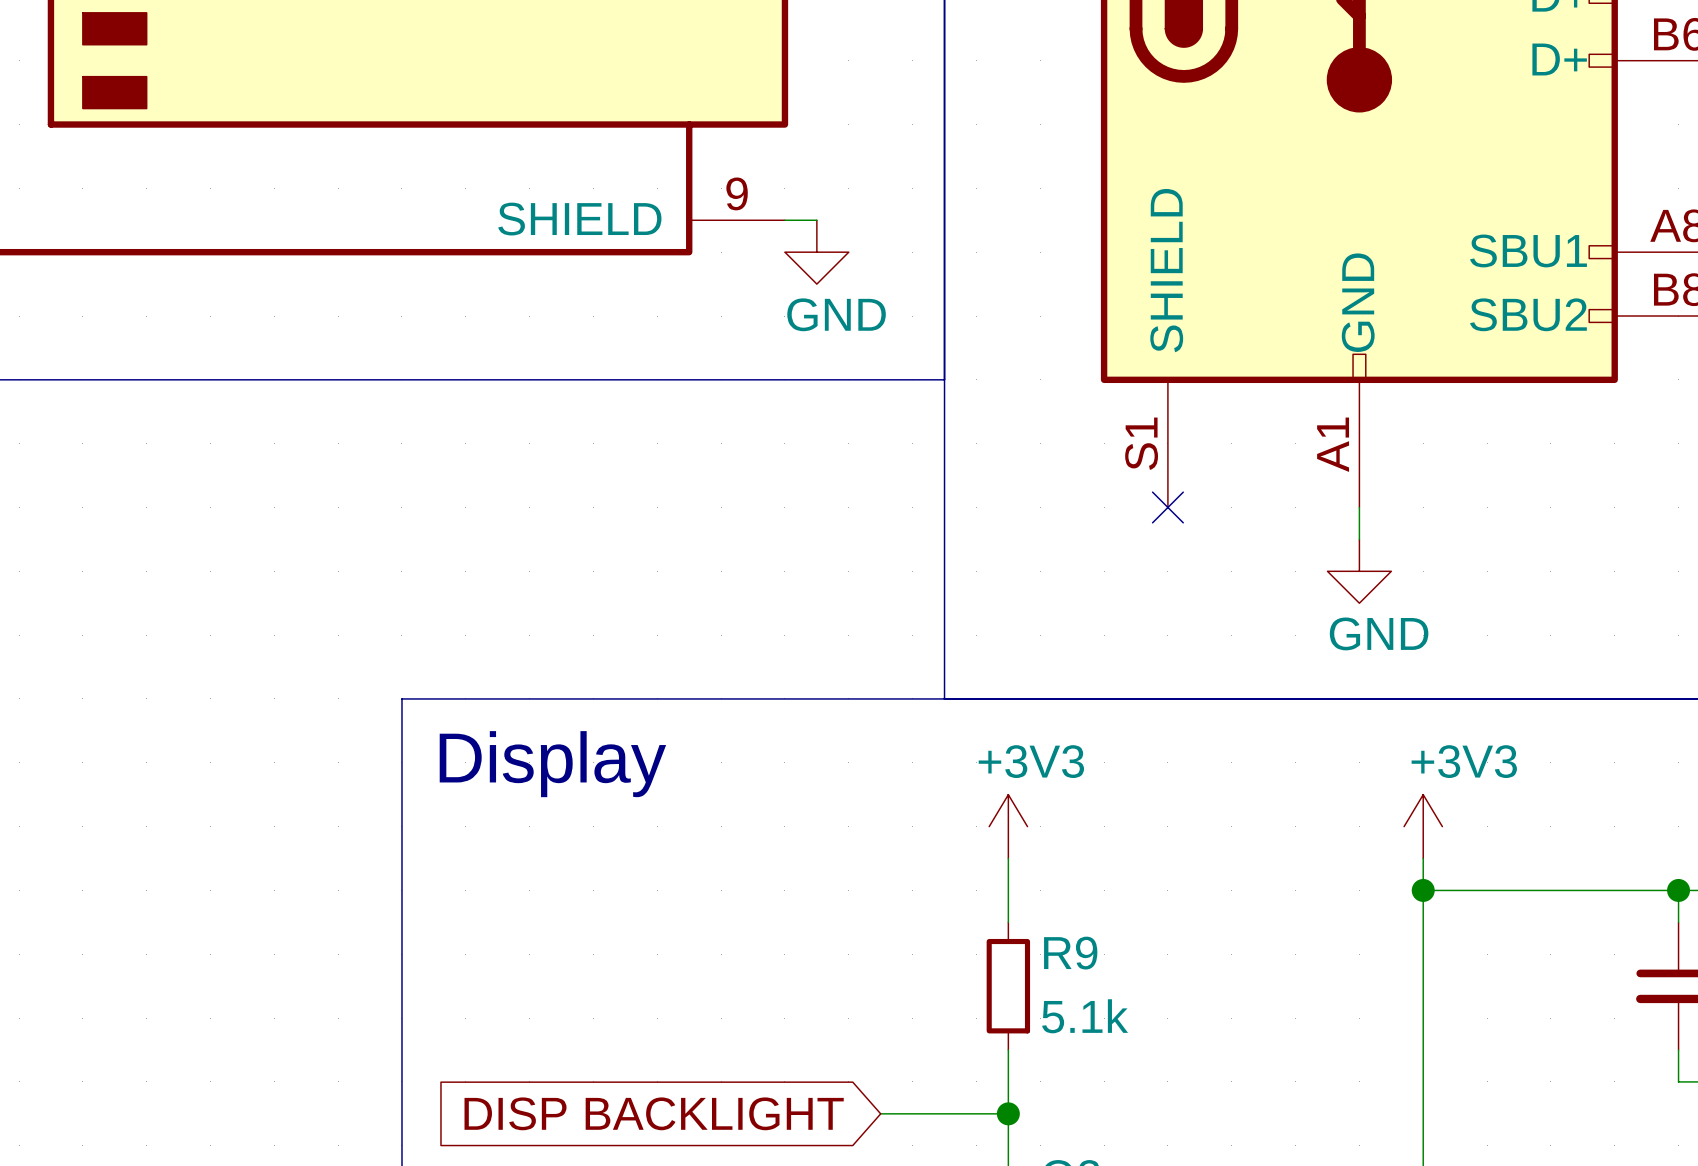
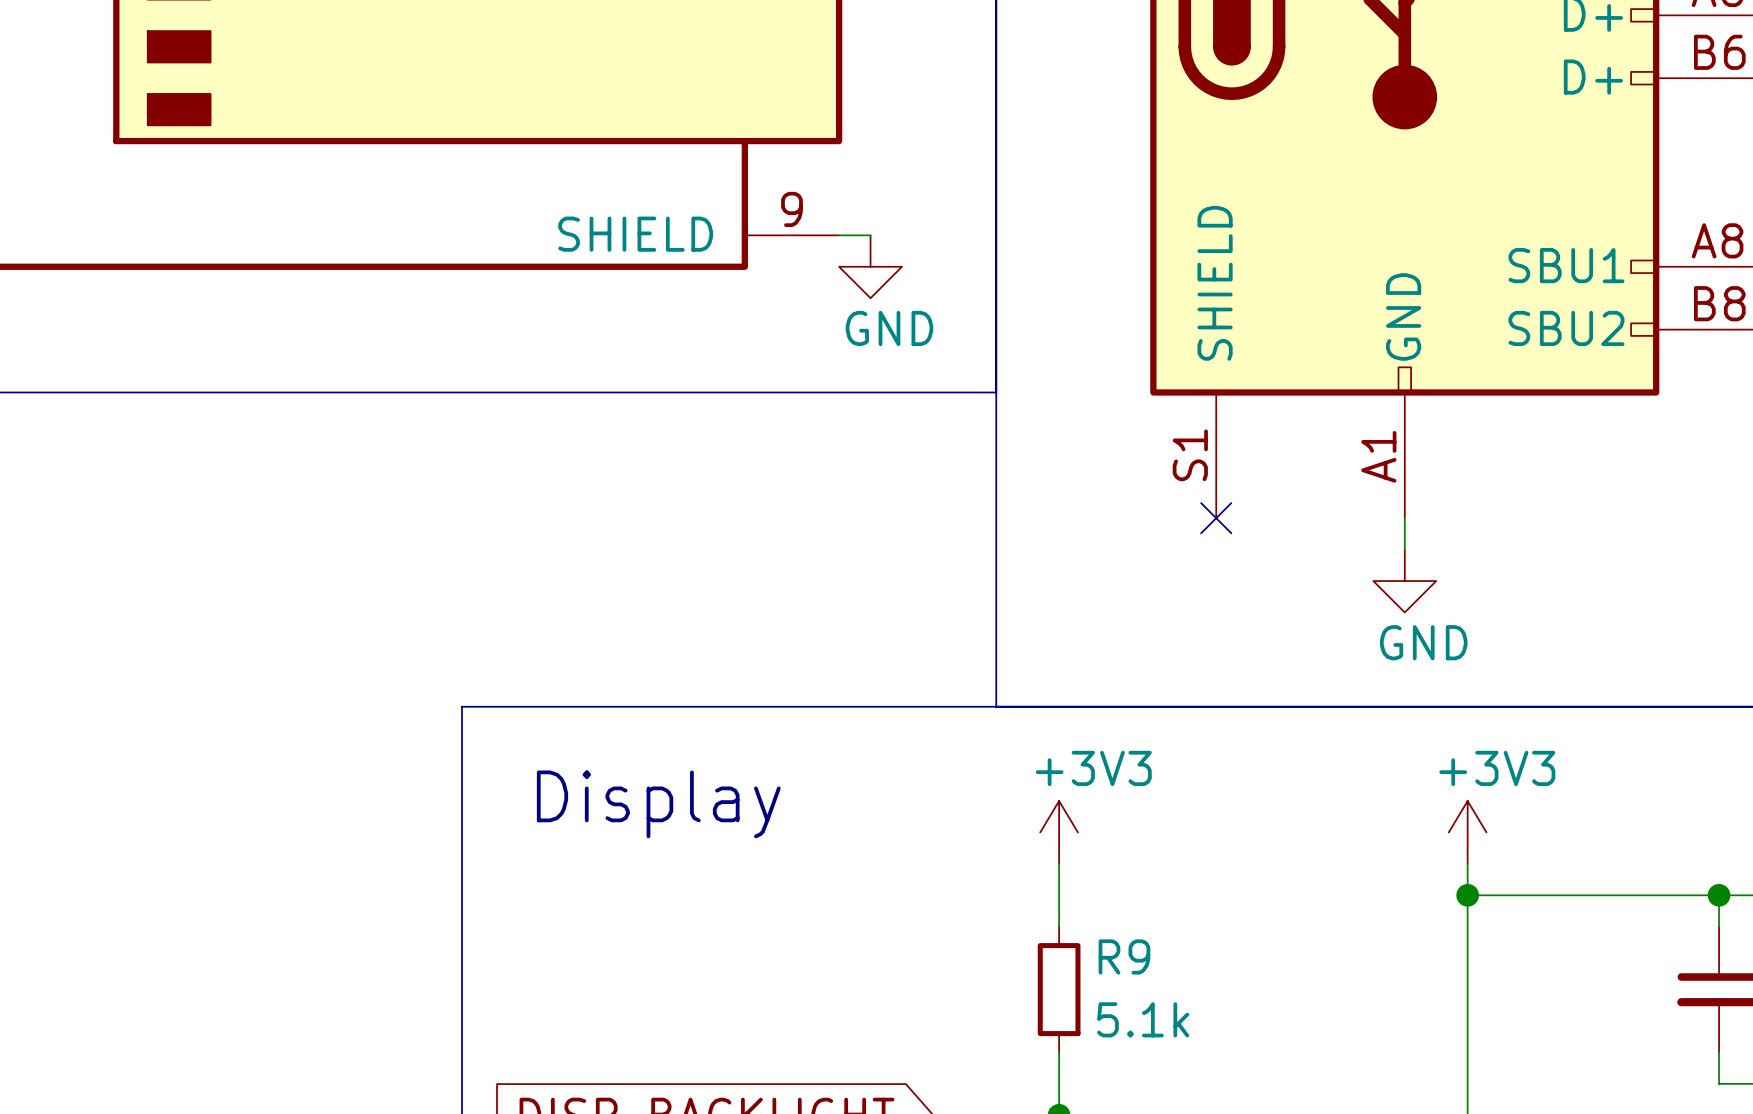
text position: Display (552, 764) -> Display (658, 804)

